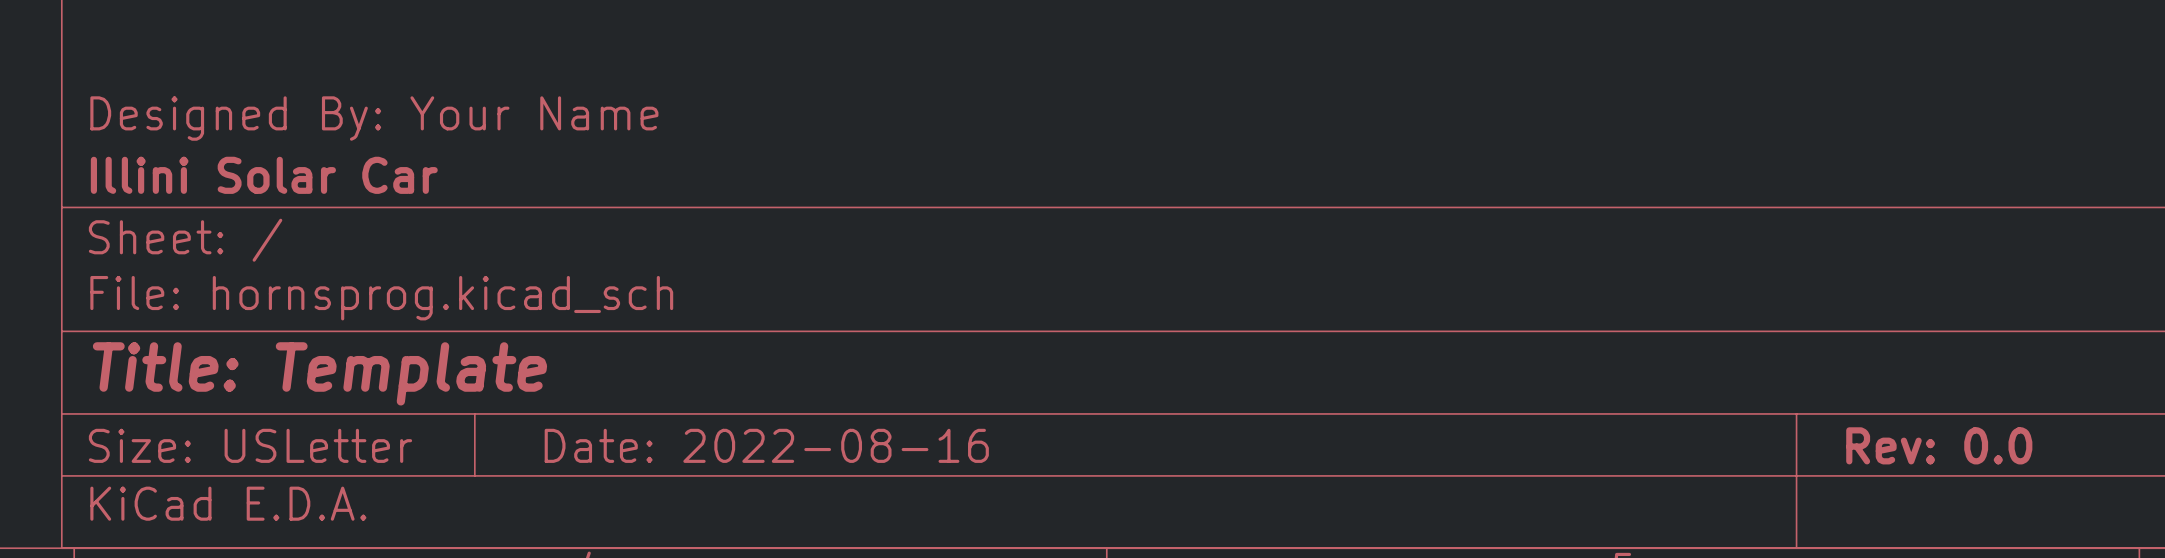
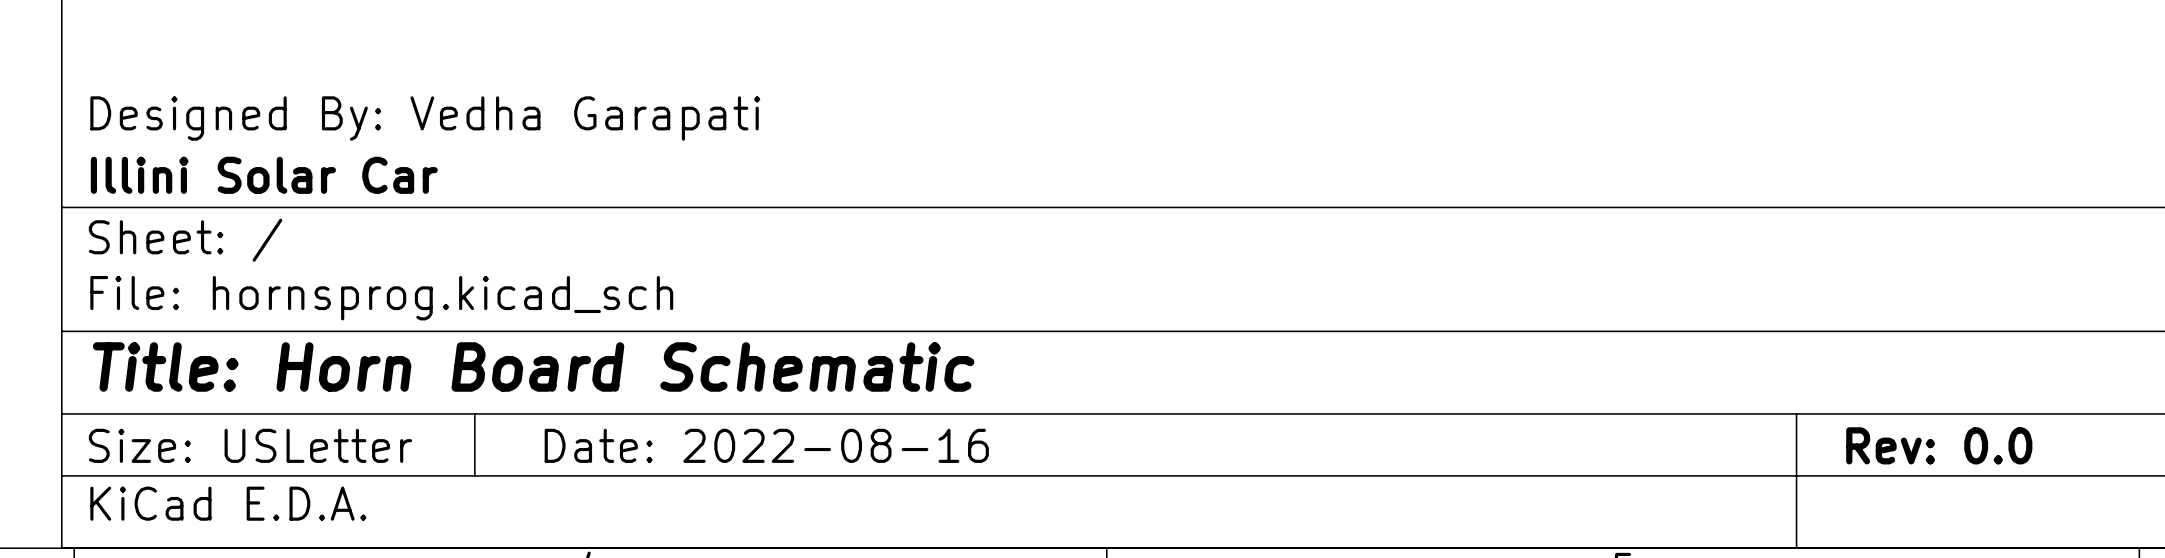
title block: Designed By: Your Name (374, 118) -> Designed By: Vedha Garapati (425, 118)
title block: Title: Template (319, 373) -> Title: Horn Board Schematic (533, 366)

